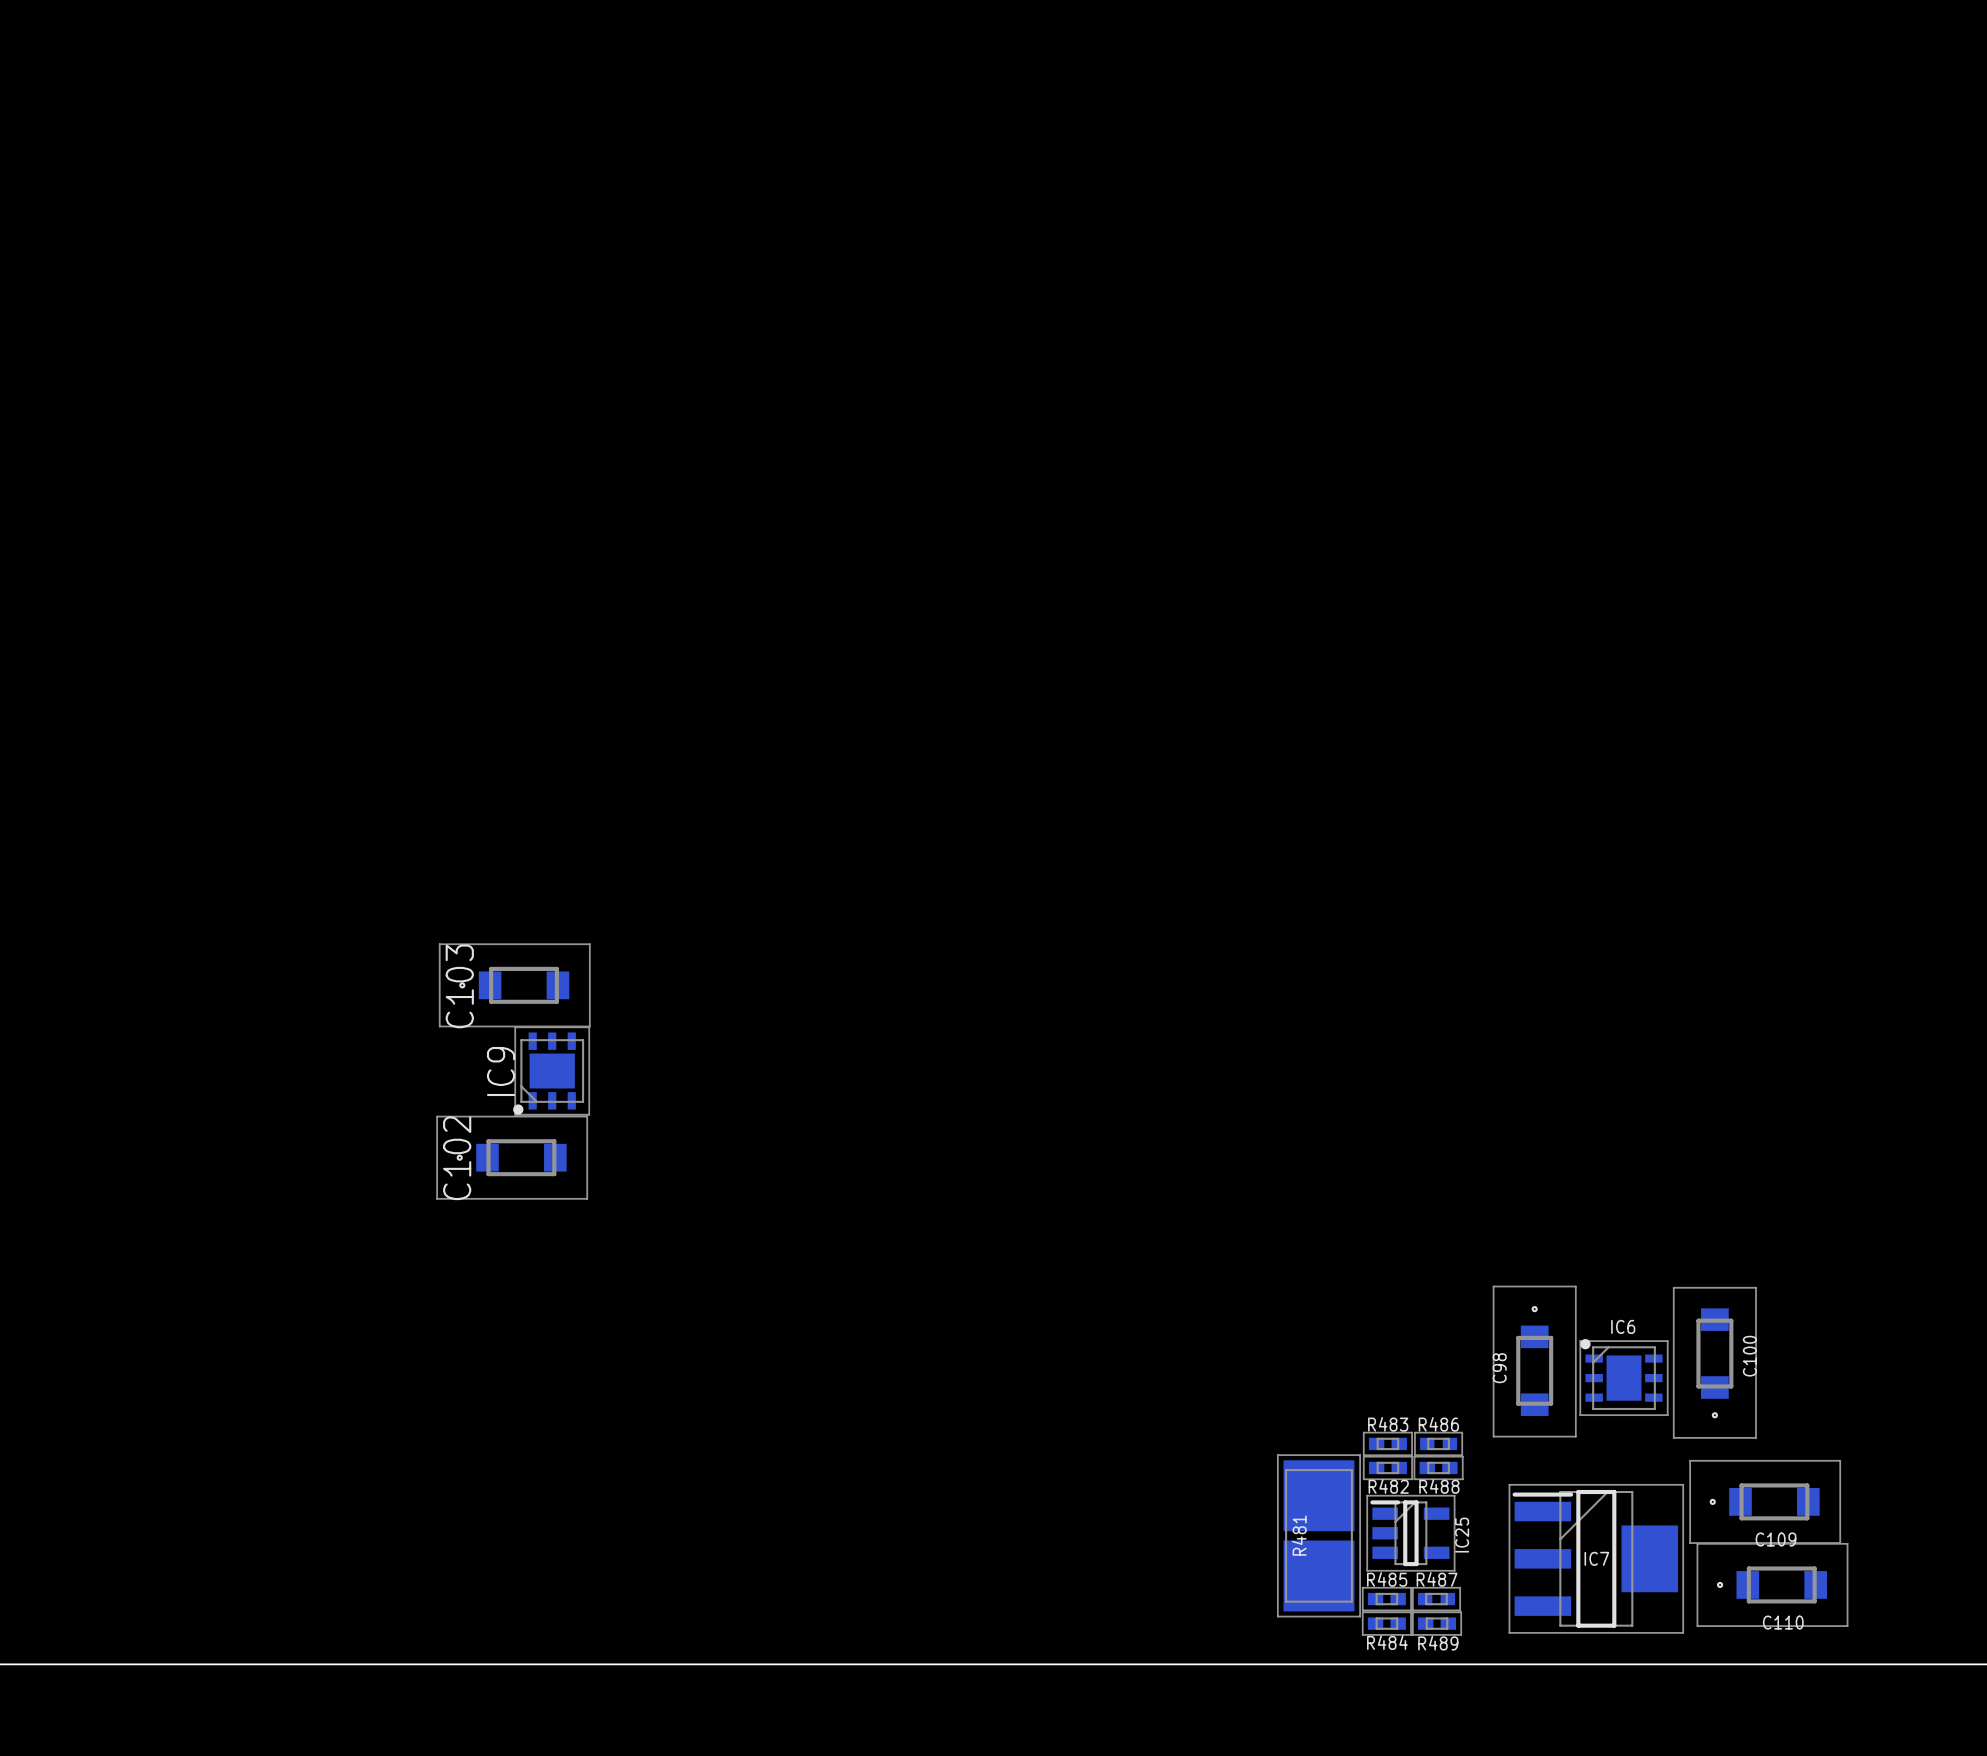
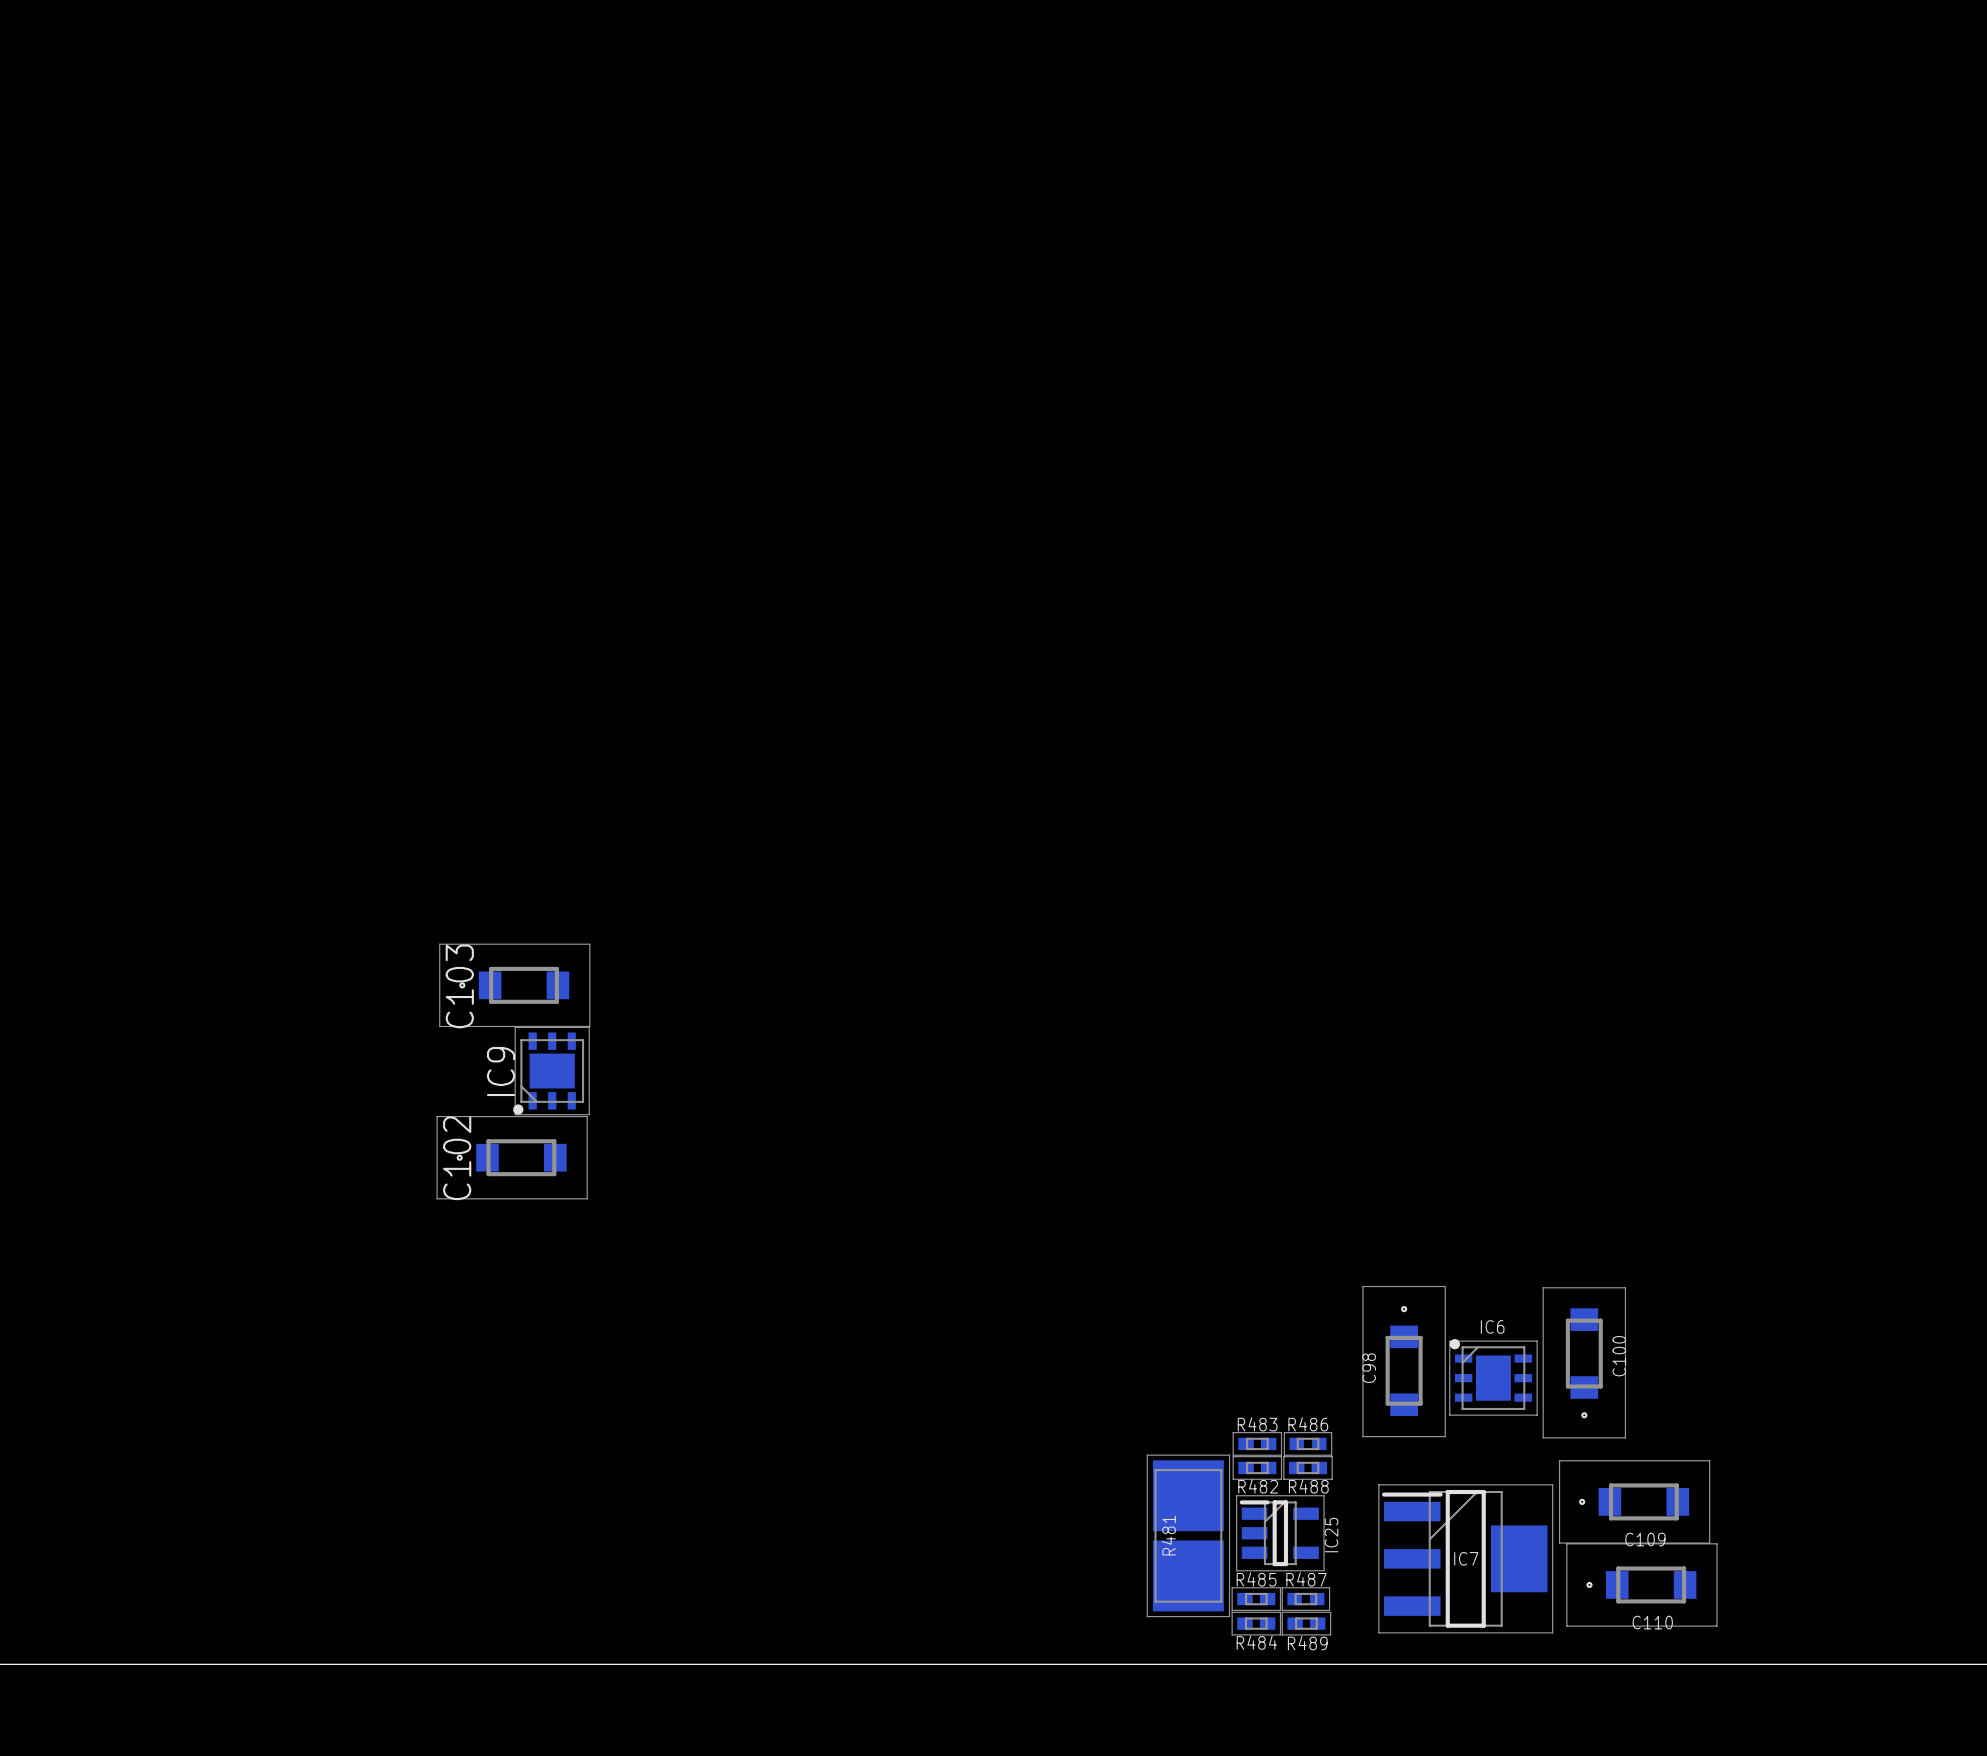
C98 position: (1534, 1361) -> (1404, 1361)
C100 position: (1714, 1362) -> (1584, 1362)
IC6 position: (1624, 1377) -> (1493, 1377)
R483 position: (1387, 1443) -> (1257, 1443)
R486 position: (1438, 1443) -> (1308, 1443)
R482 position: (1387, 1467) -> (1257, 1467)
R488 position: (1438, 1467) -> (1308, 1467)
C109 position: (1765, 1501) -> (1634, 1501)
IC25 position: (1410, 1533) -> (1280, 1533)
R481 position: (1318, 1535) -> (1188, 1535)
IC7 position: (1596, 1558) -> (1465, 1558)
C110 position: (1772, 1584) -> (1641, 1584)
R485 position: (1386, 1599) -> (1256, 1599)
R487 position: (1436, 1599) -> (1305, 1599)
R484 position: (1386, 1623) -> (1256, 1623)
R489 position: (1437, 1623) -> (1306, 1623)

